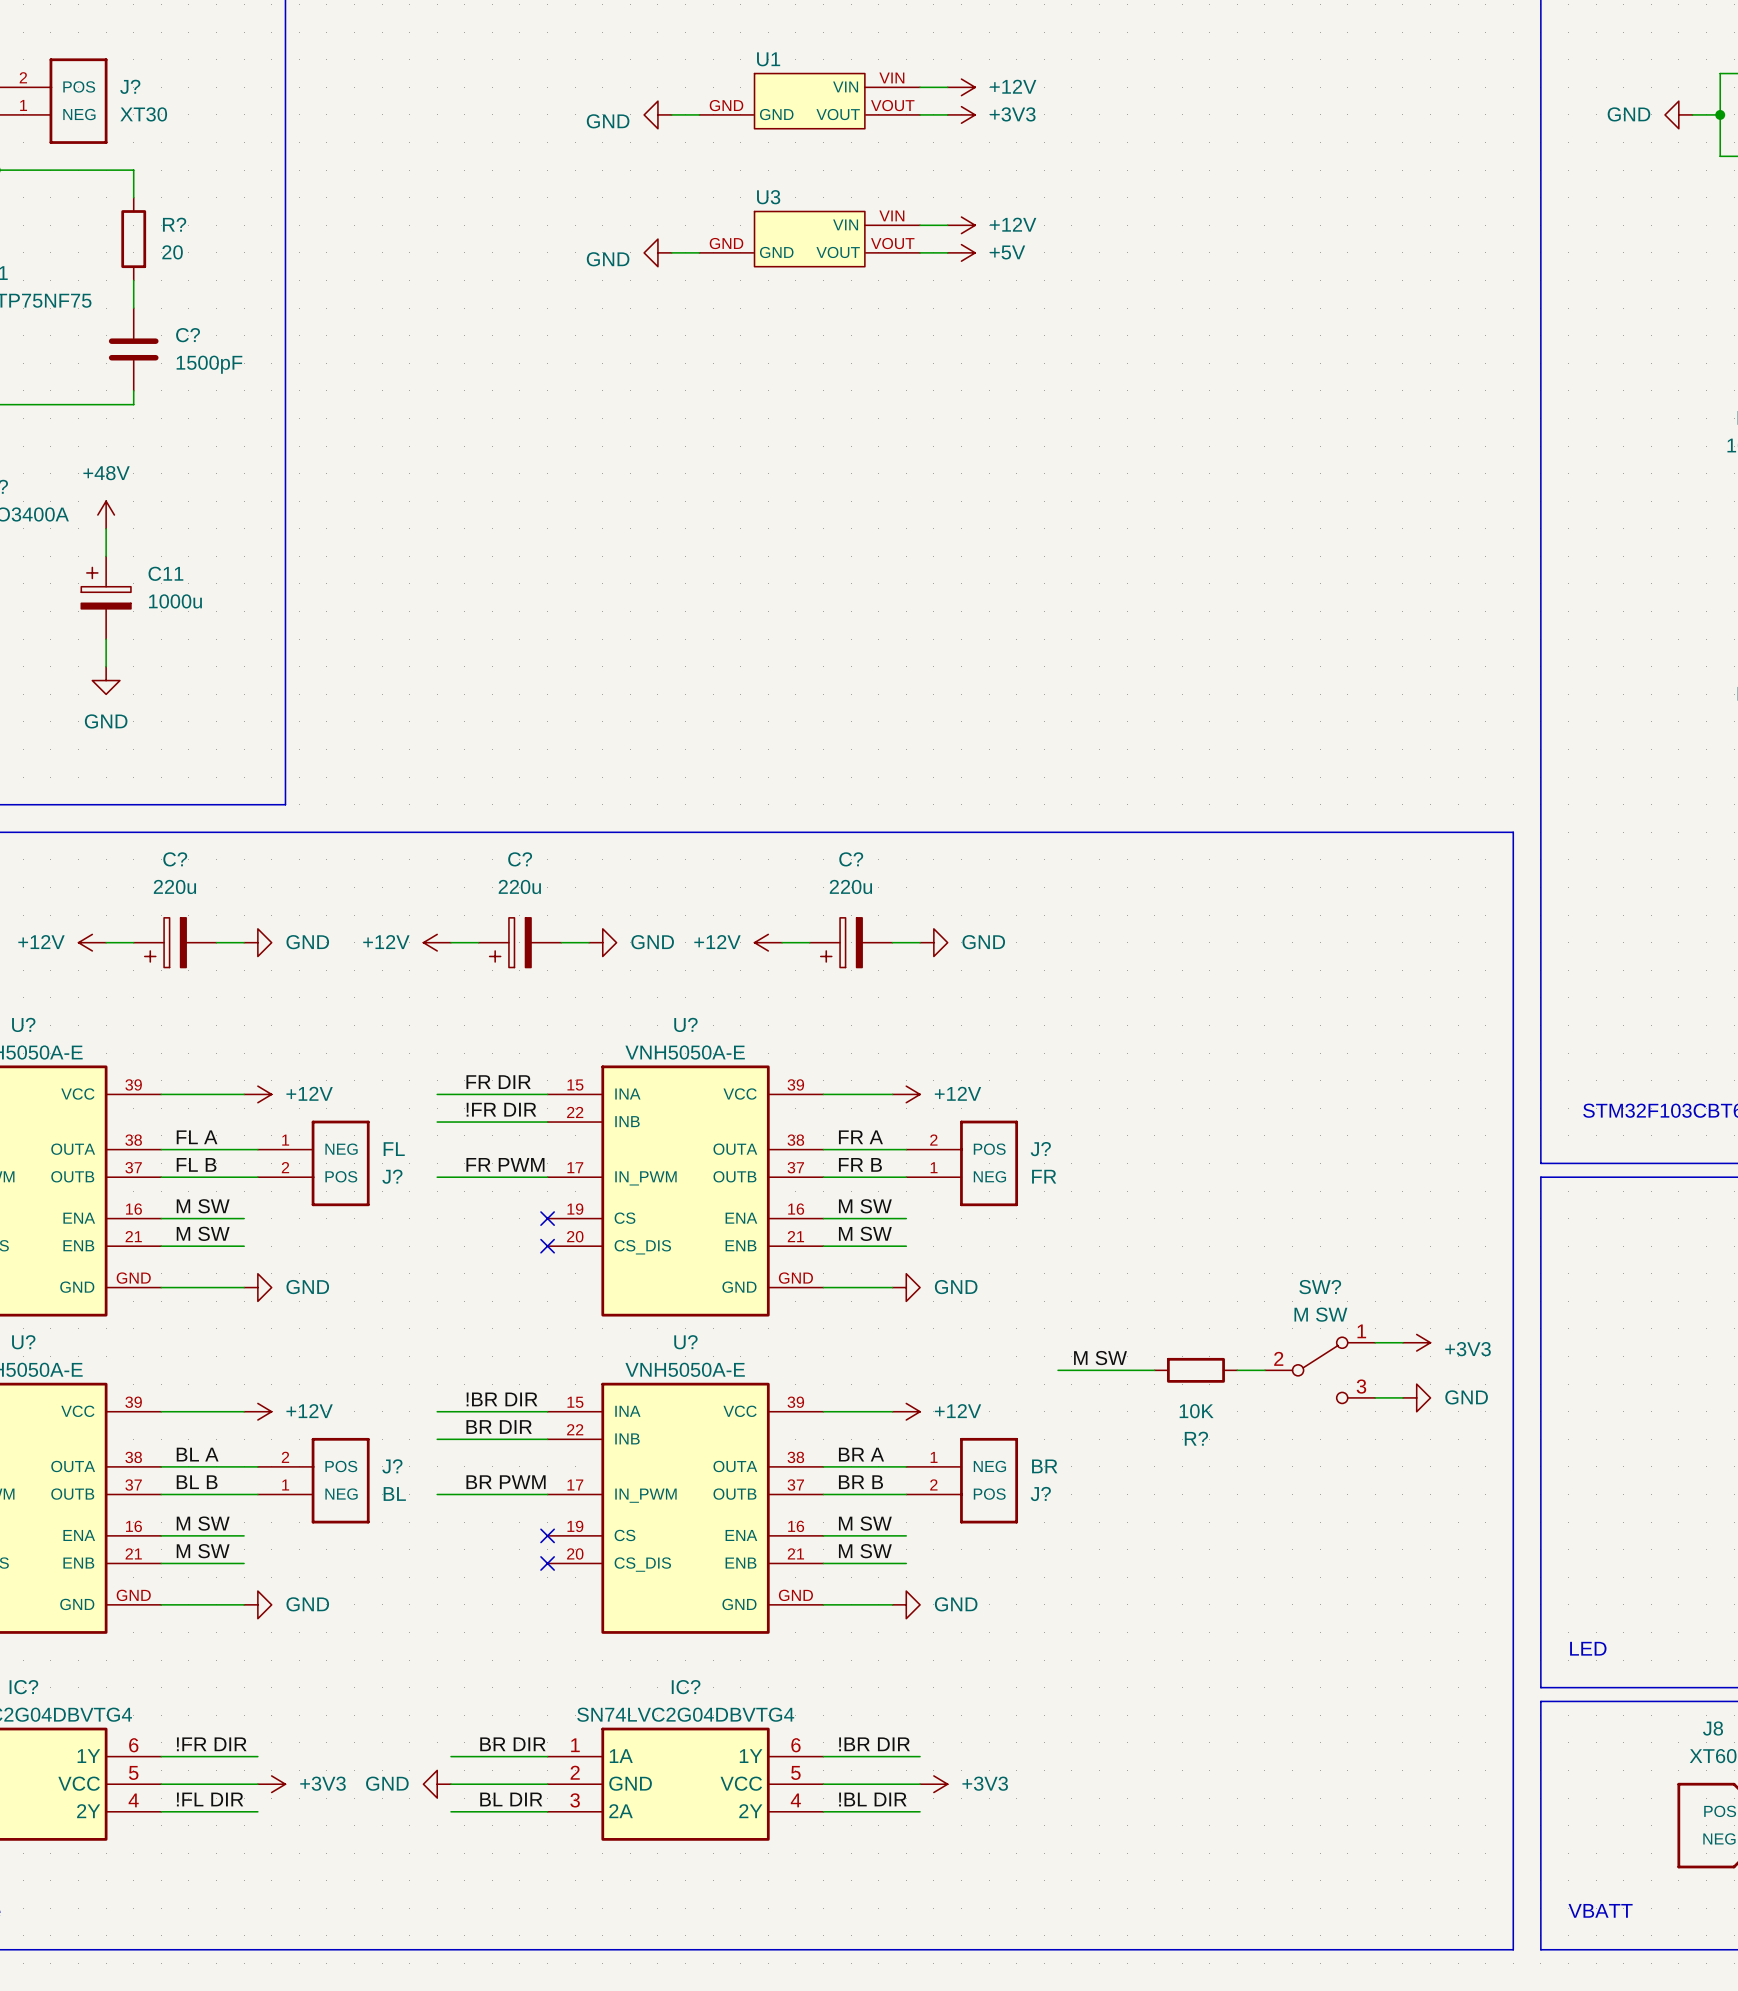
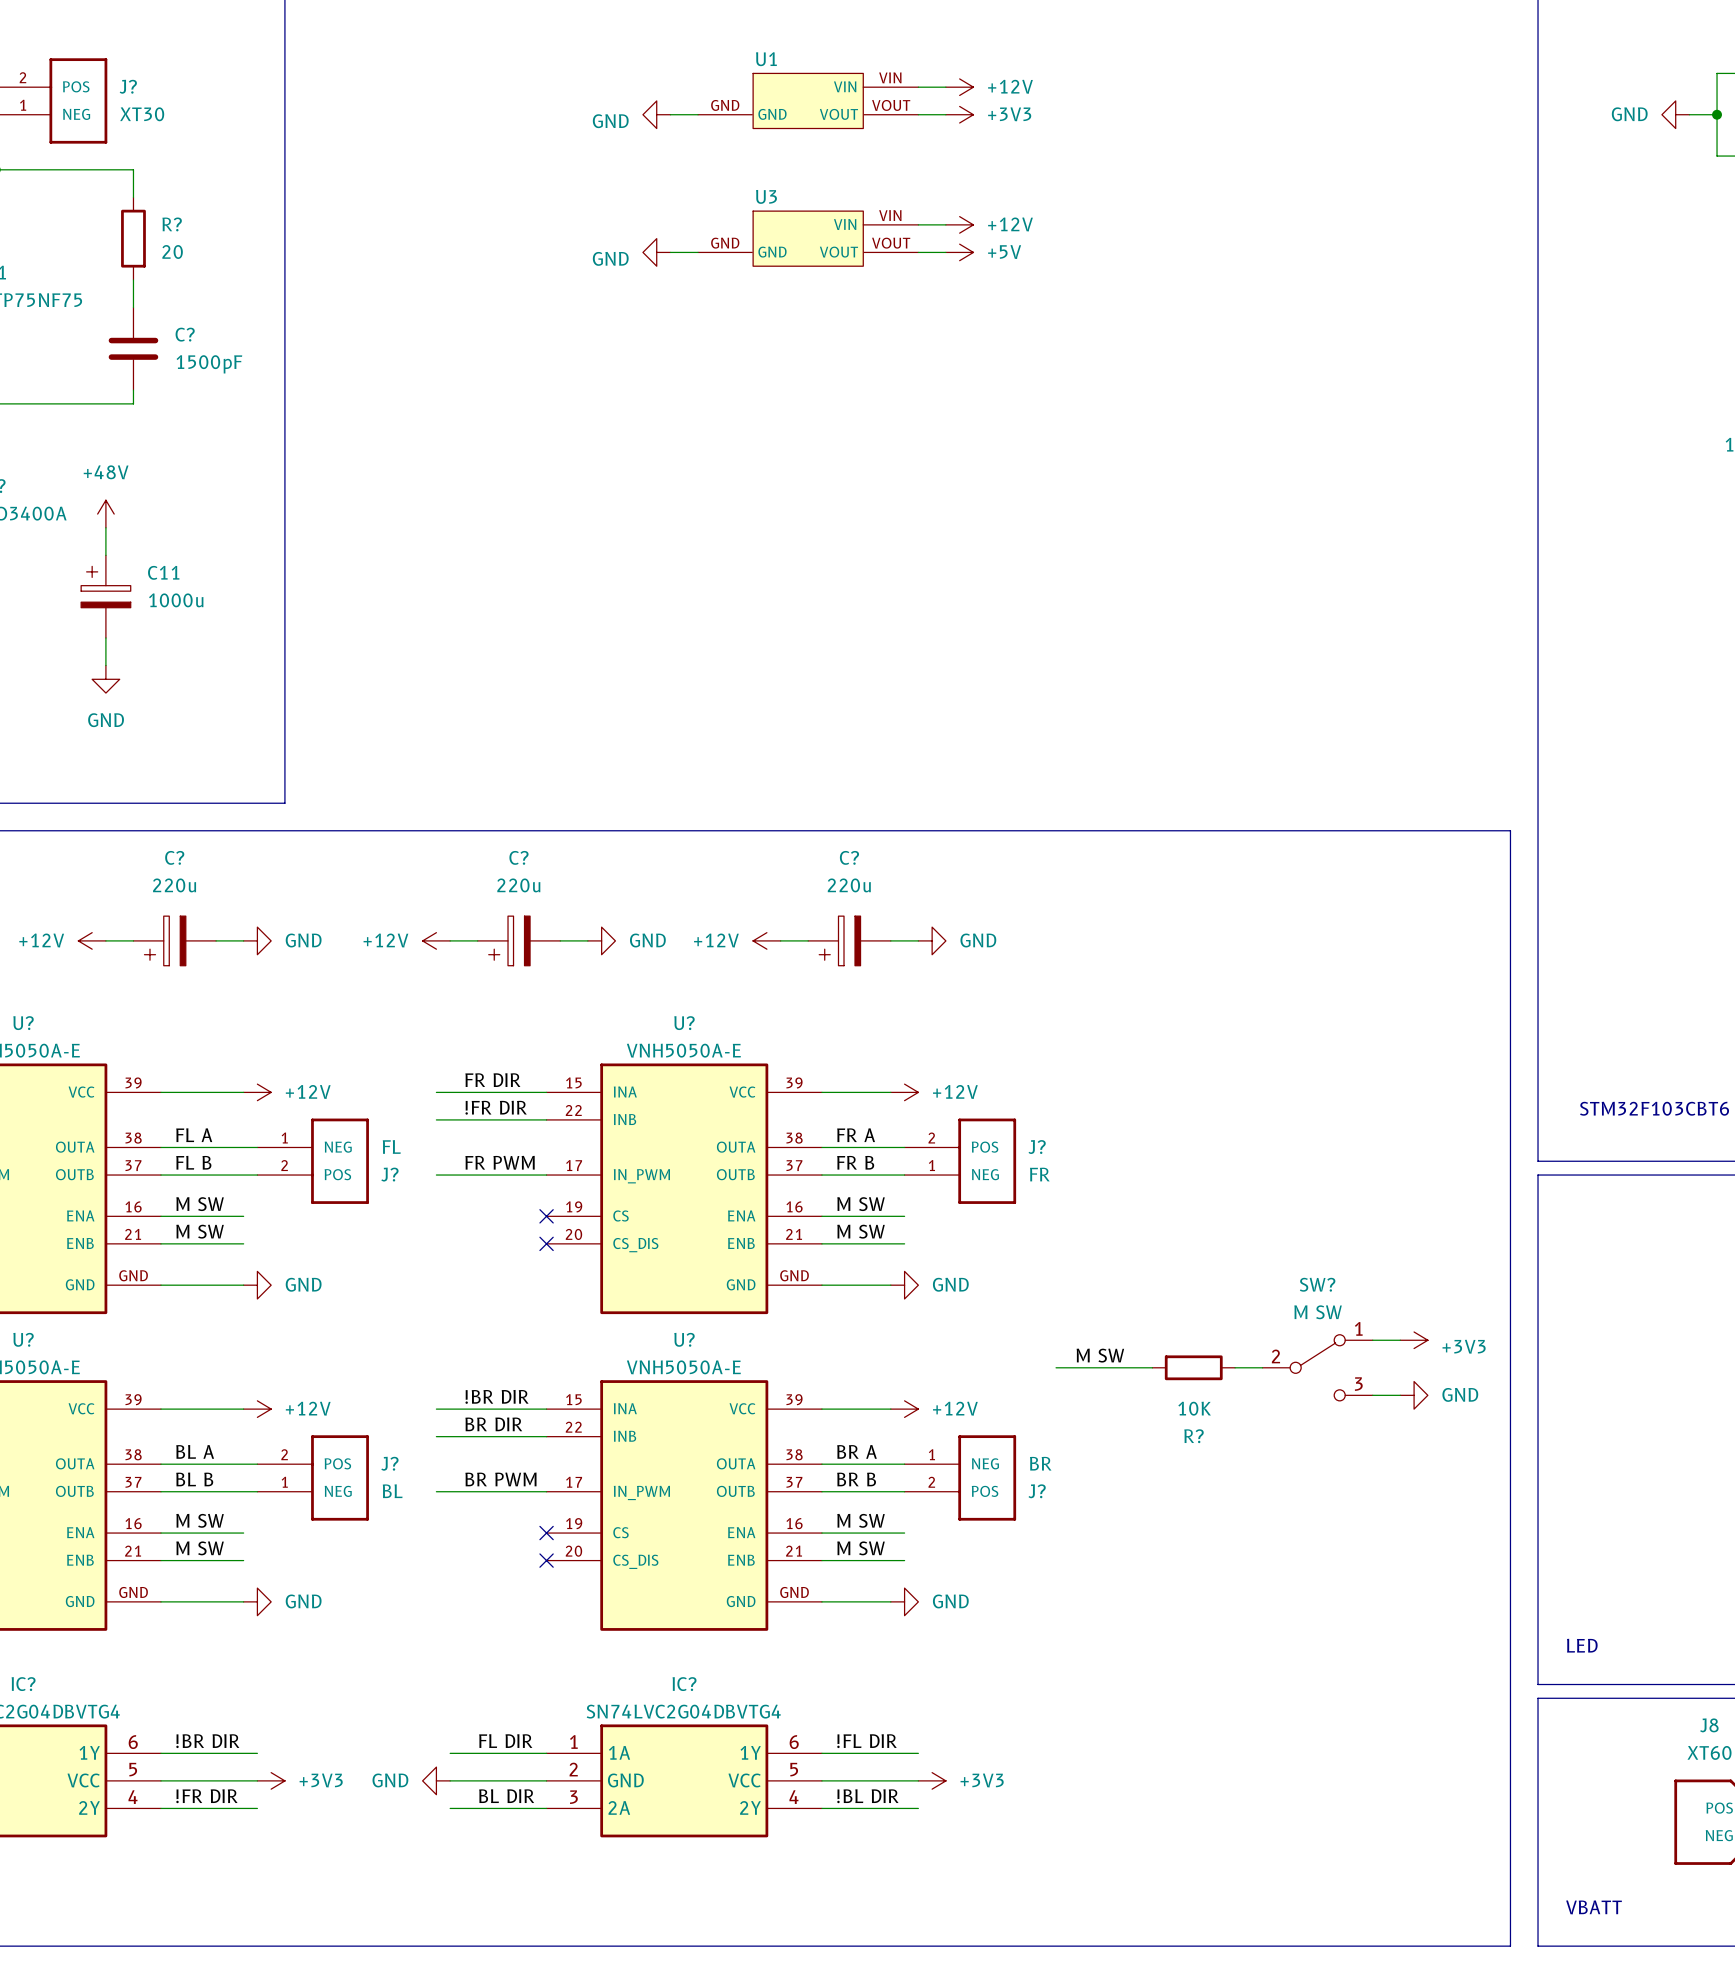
label: !FR DIR (211, 1744) -> !BR DIR (207, 1741)
label: BR DIR (512, 1744) -> FL DIR (505, 1741)
label: !BR DIR (874, 1744) -> !FL DIR (867, 1741)
label: !FL DIR (210, 1799) -> !FR DIR (206, 1796)

